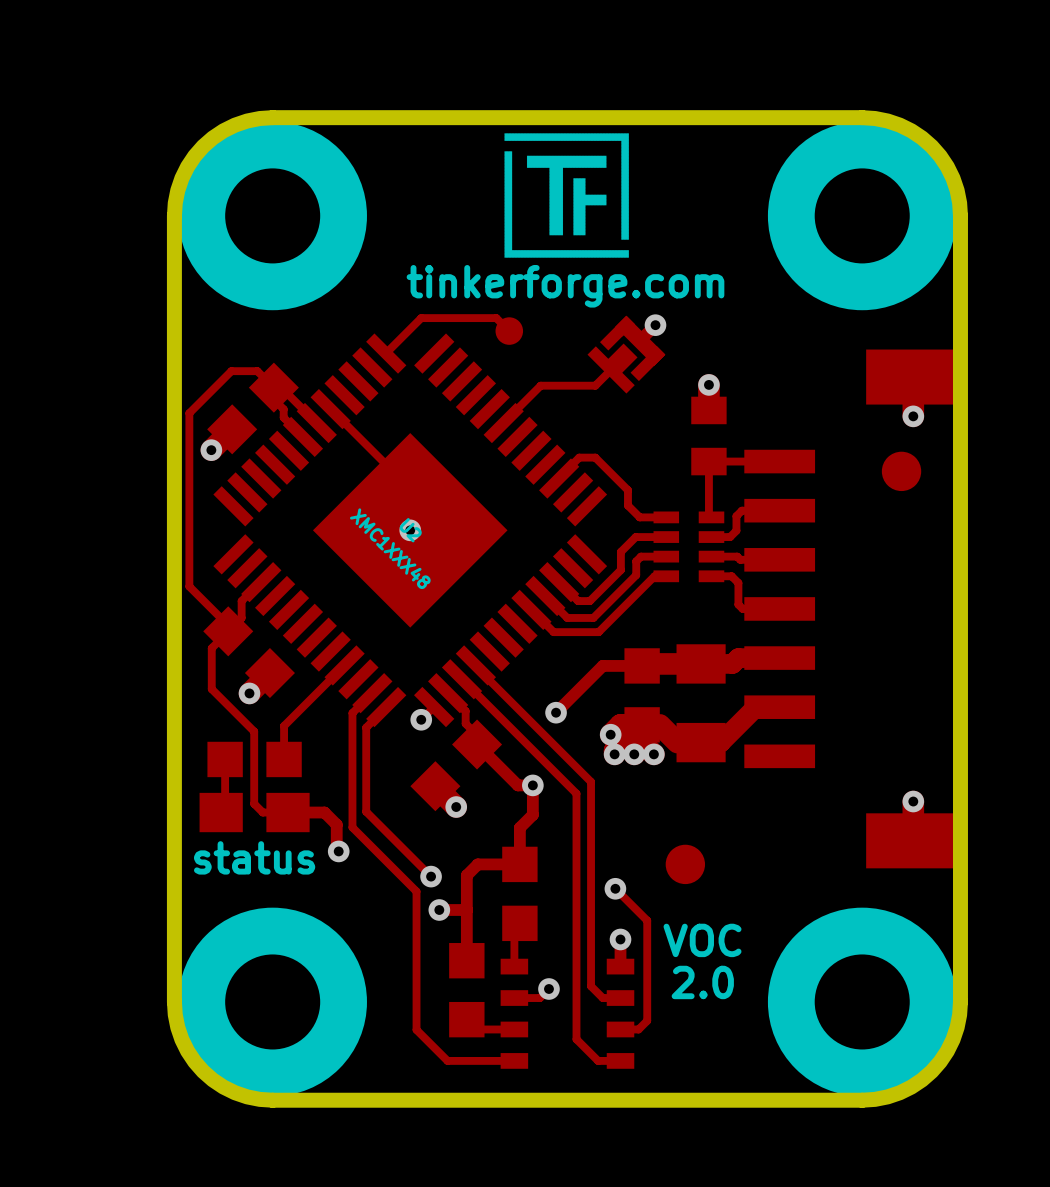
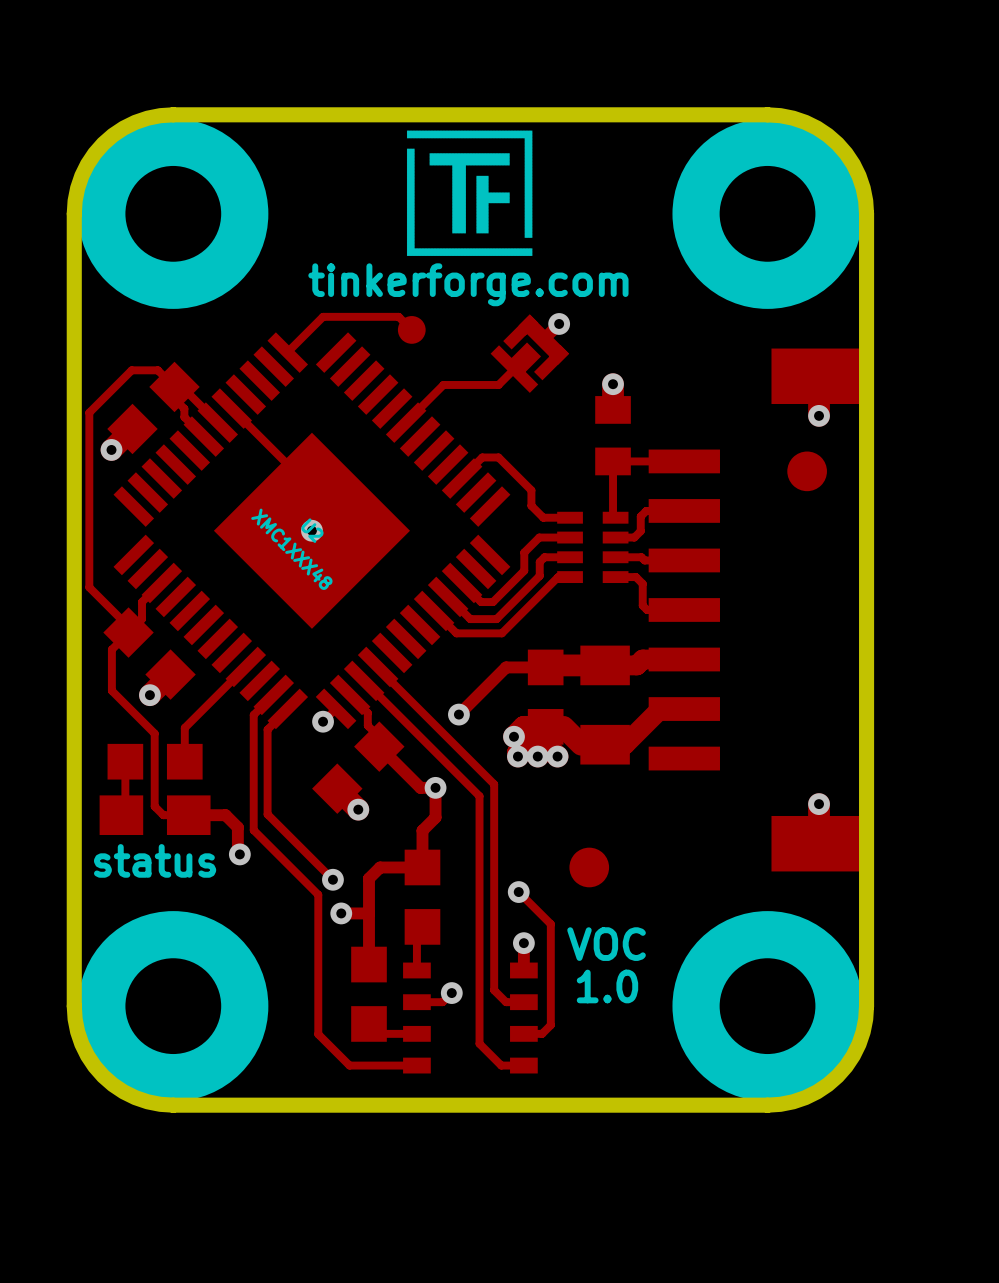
text: 2.0 (702, 982) -> 1.0 (607, 986)

